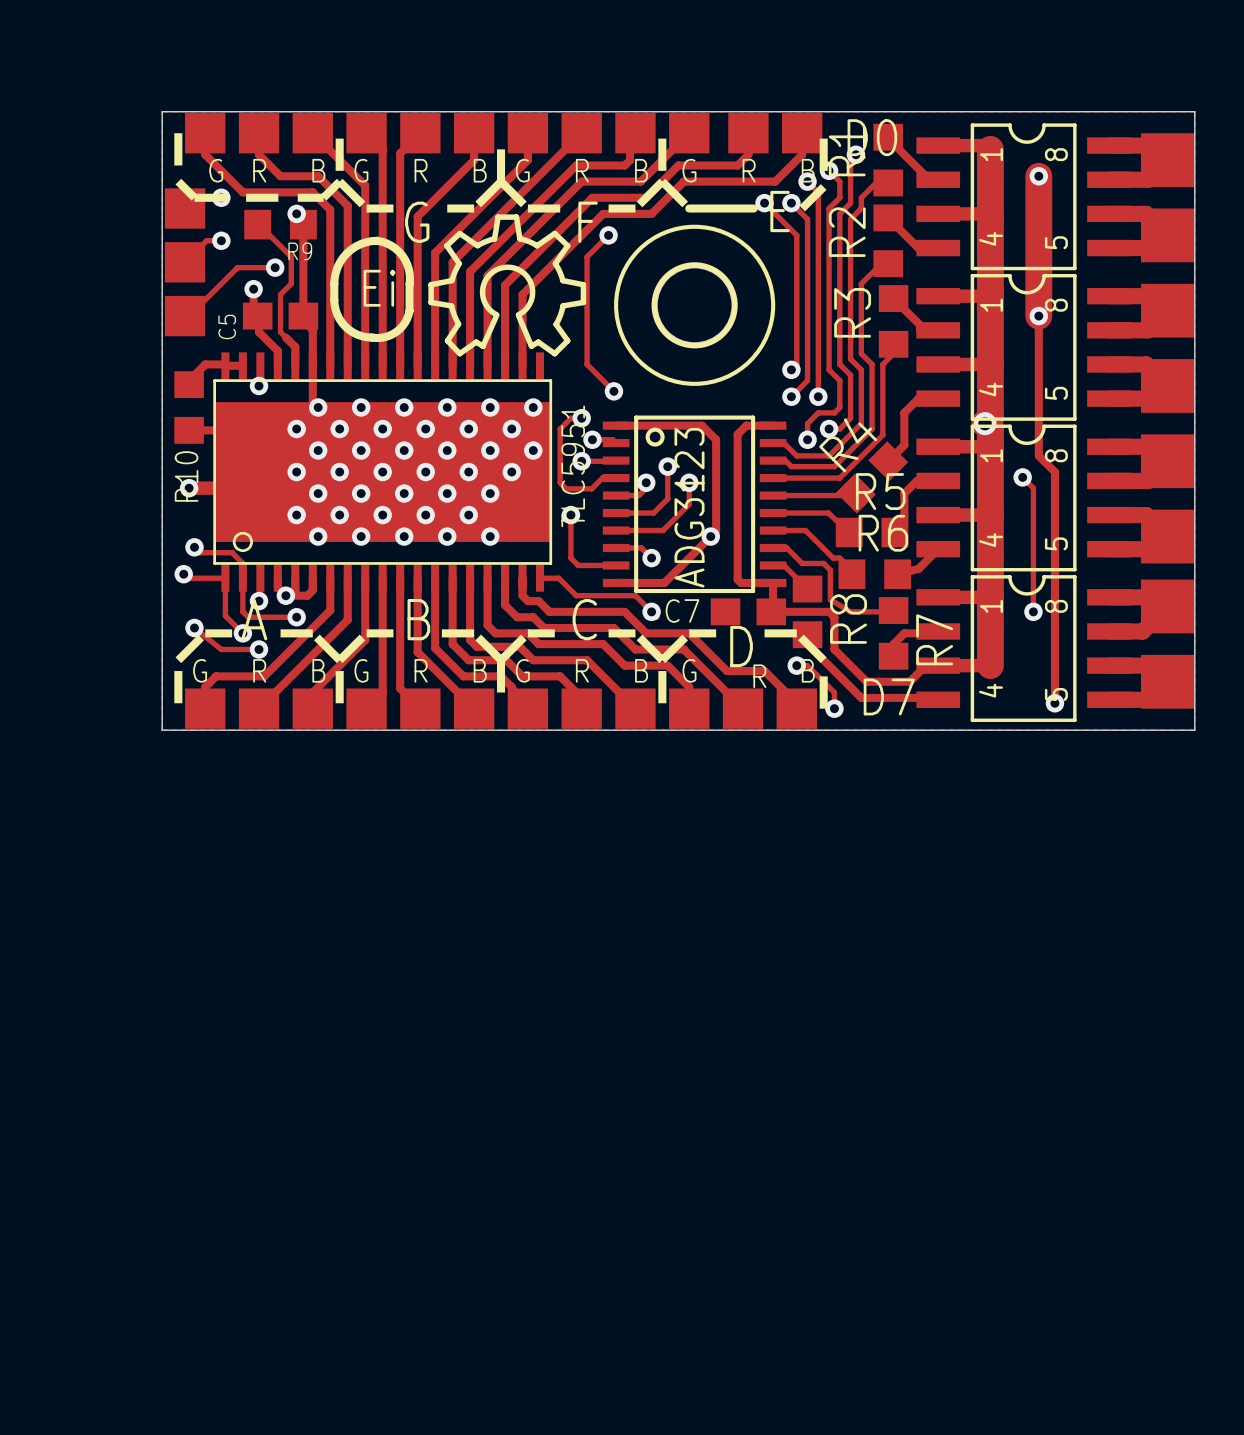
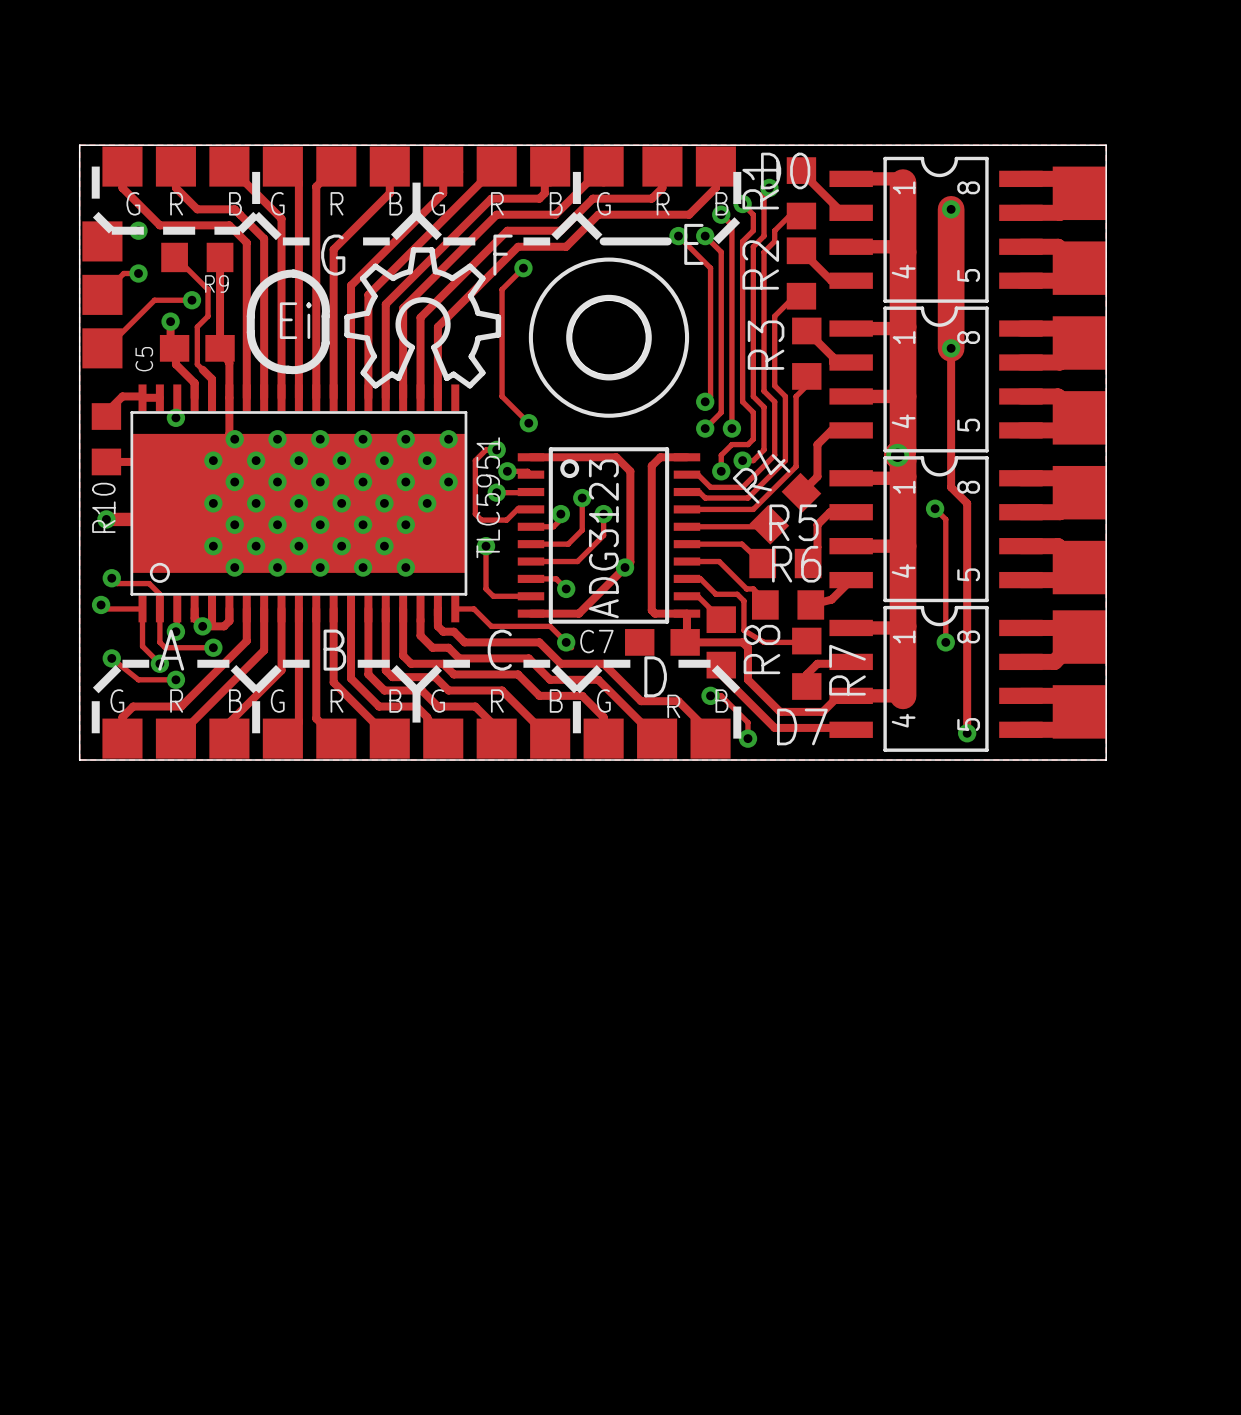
via: (296, 213) -> none

